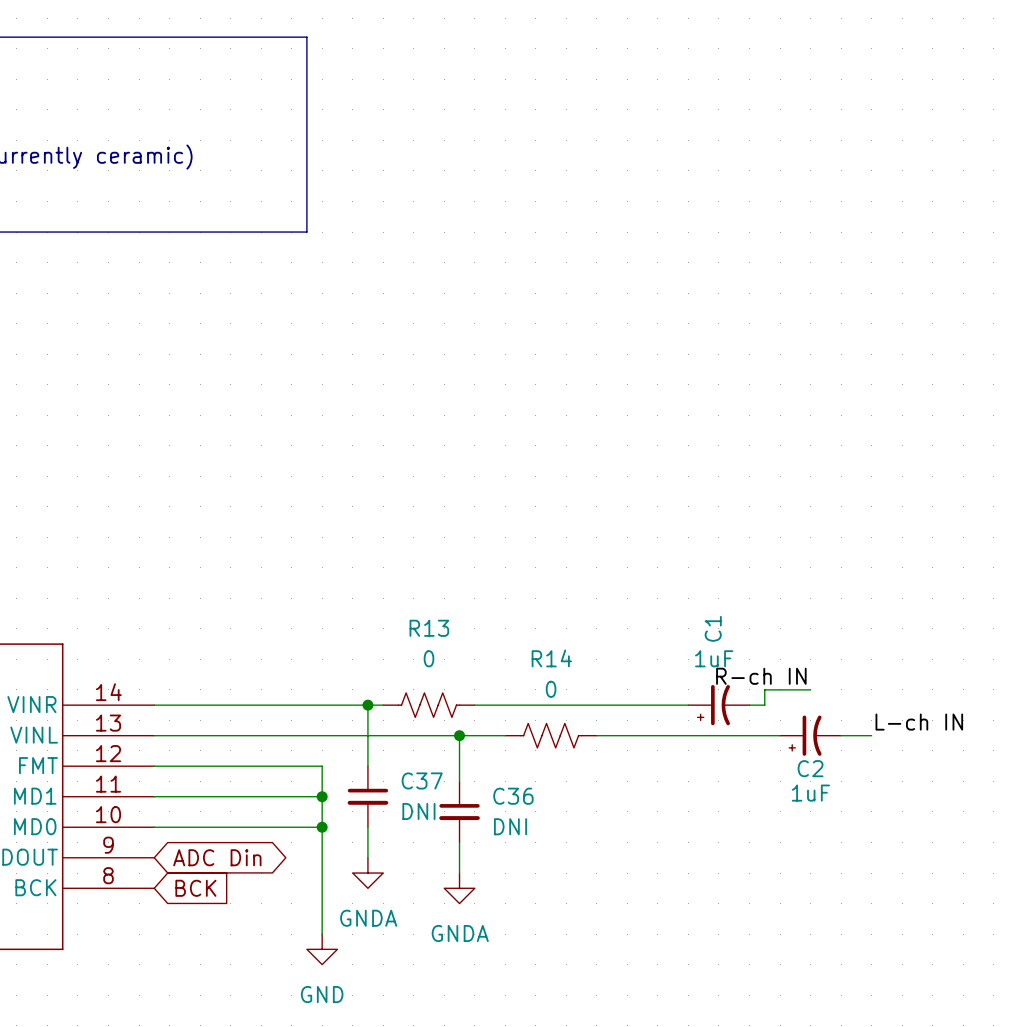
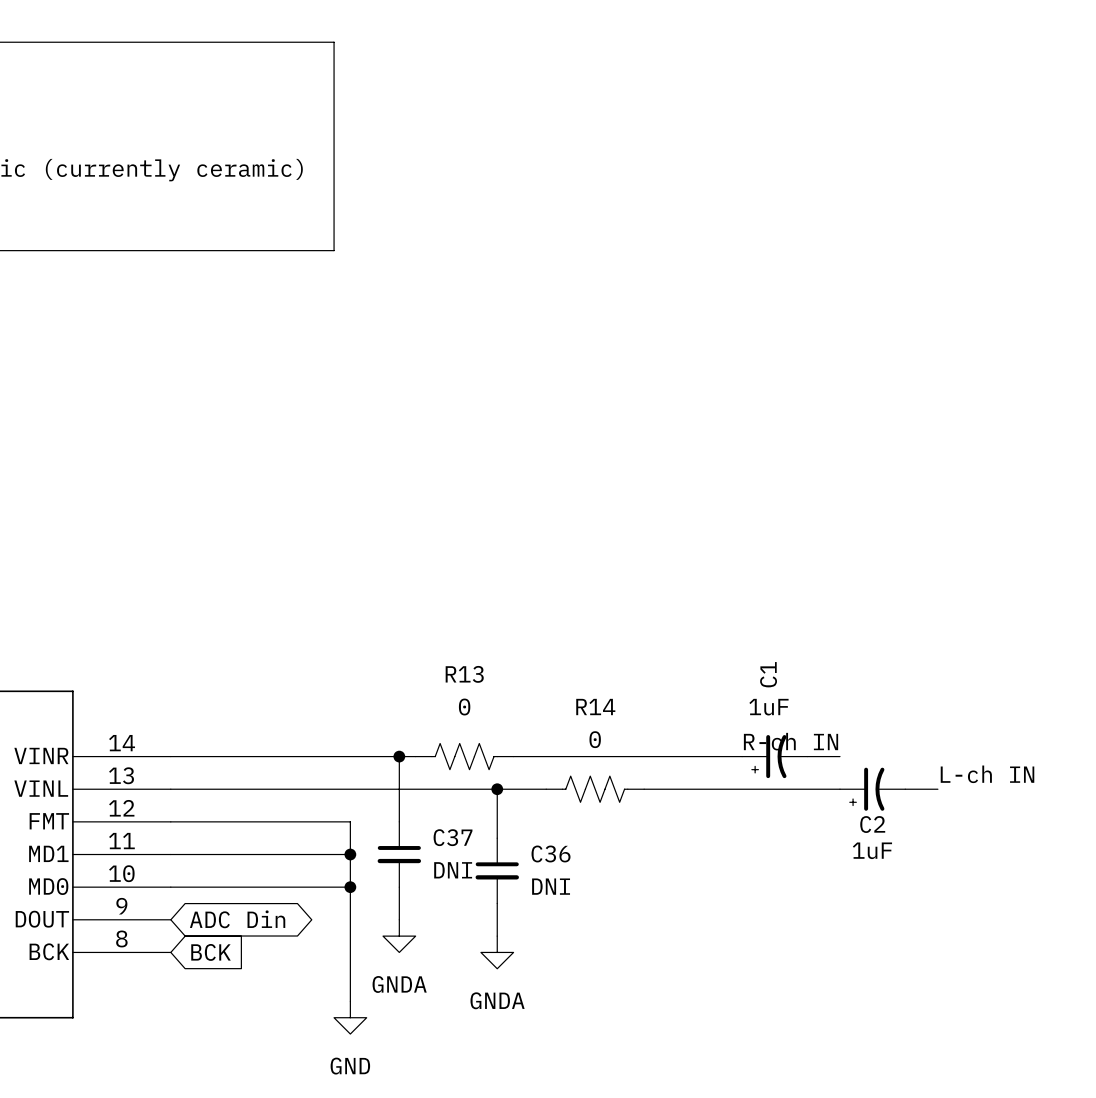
label position: R-ch IN (761, 676) -> R-ch IN (791, 741)
wire: (810, 689) (764, 689) (764, 705) -> (840, 756) (823, 756)

